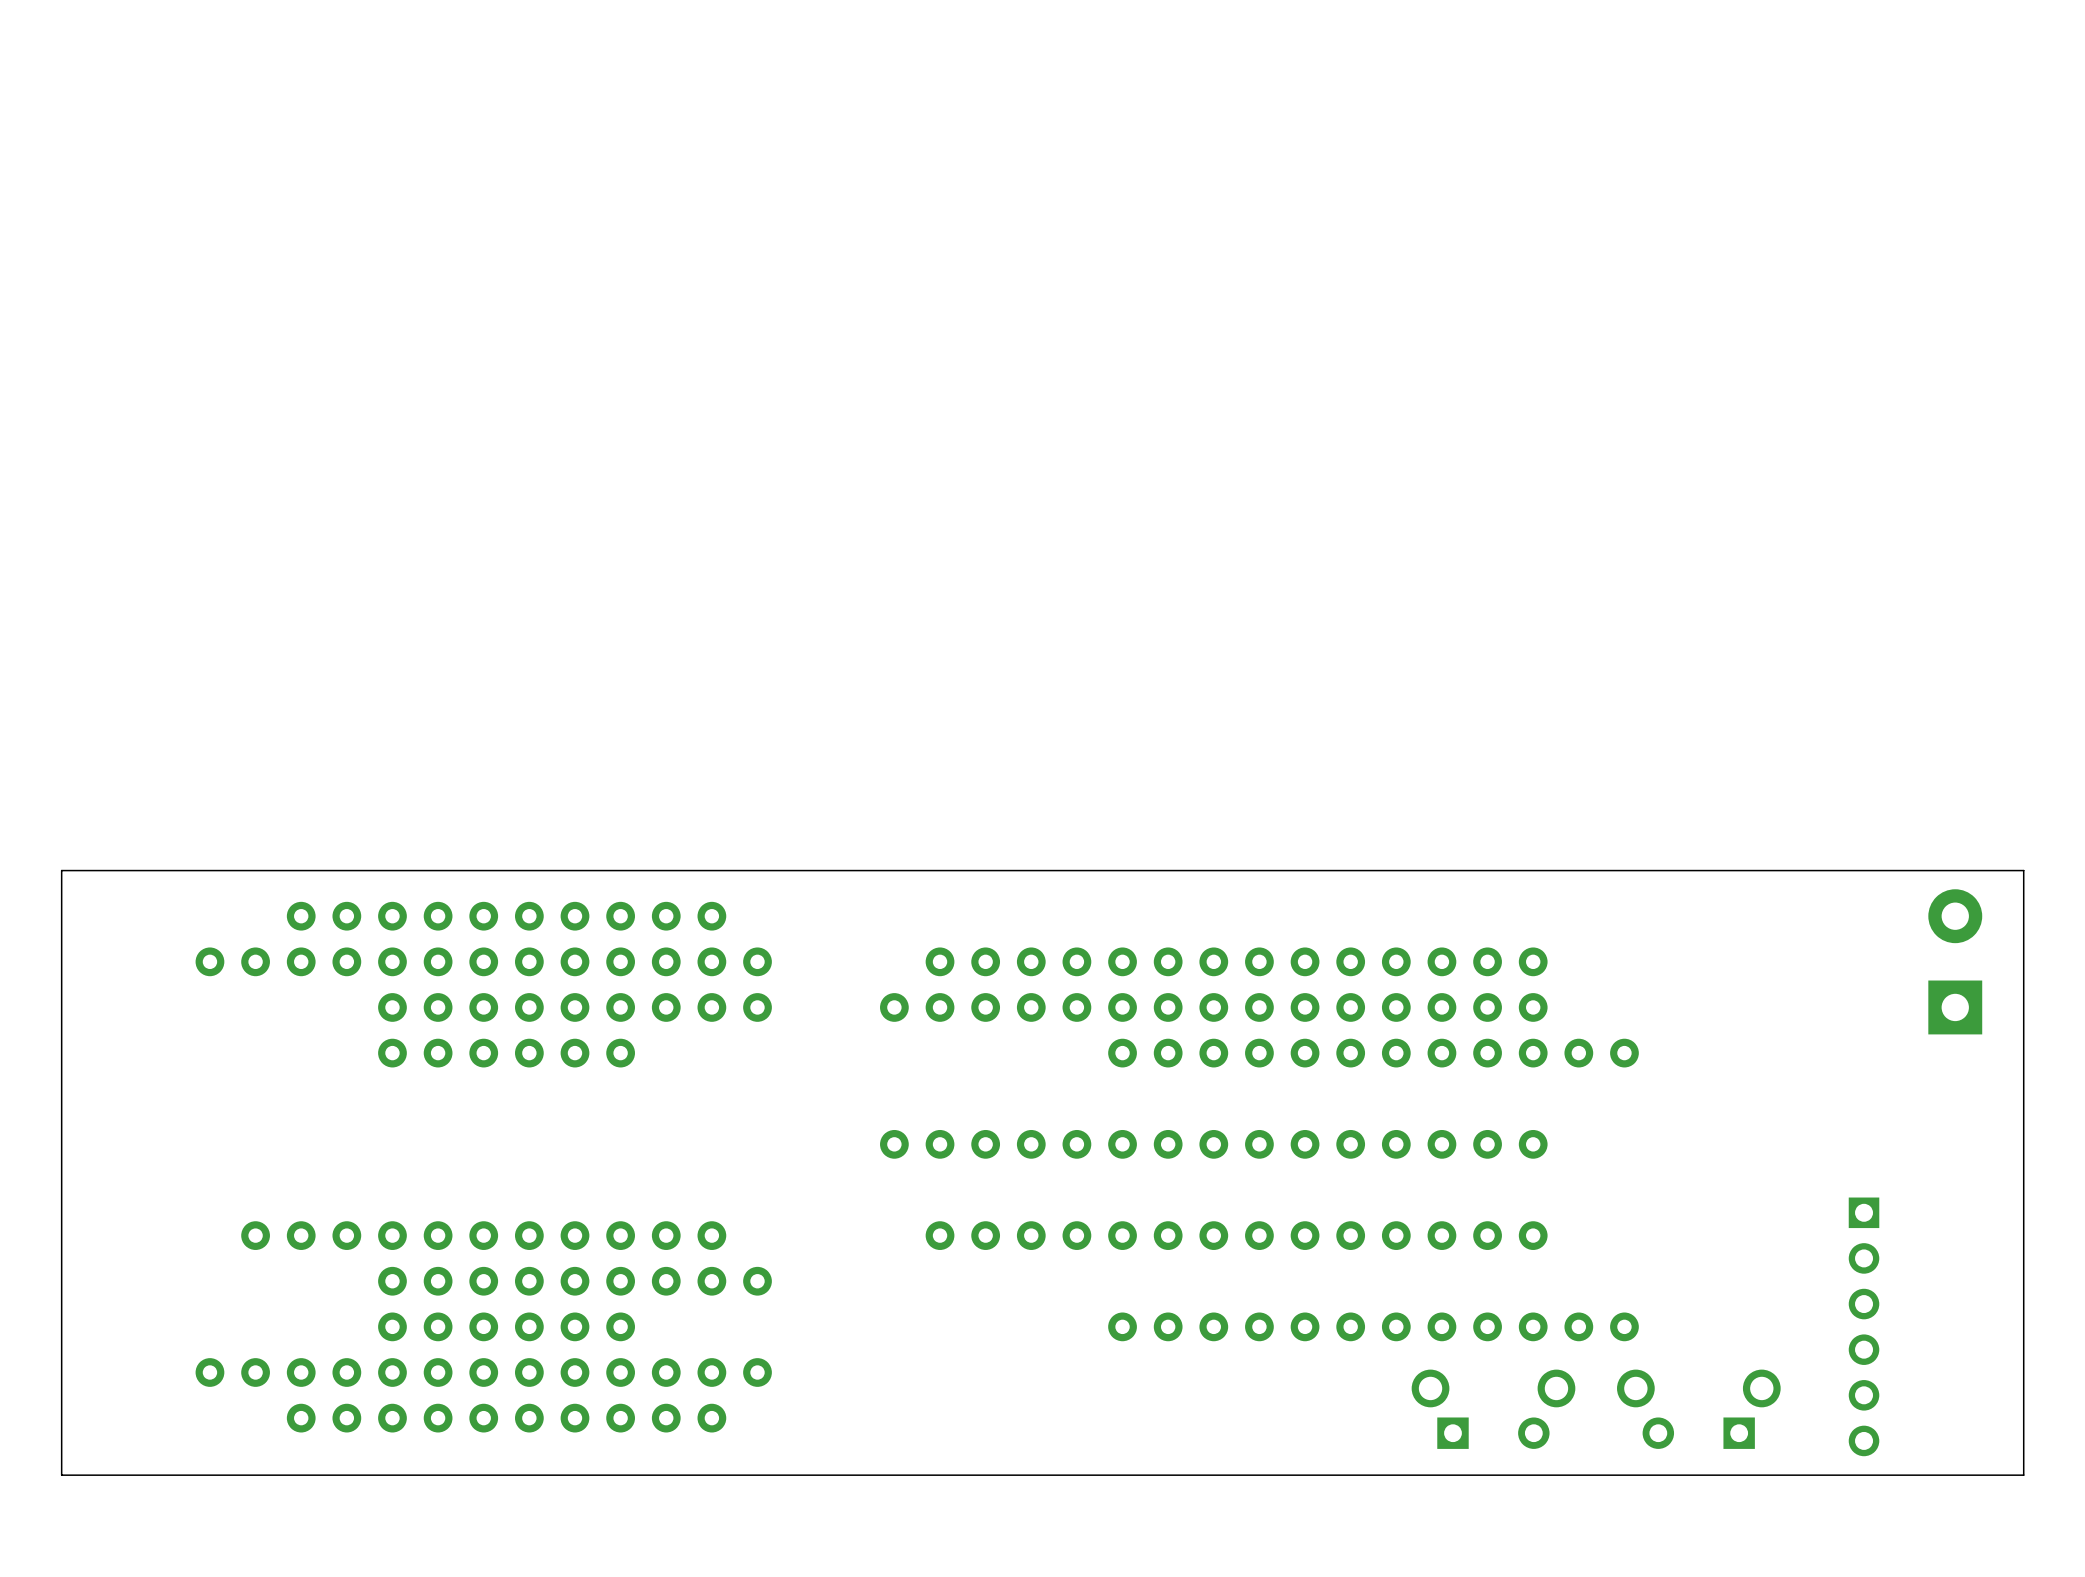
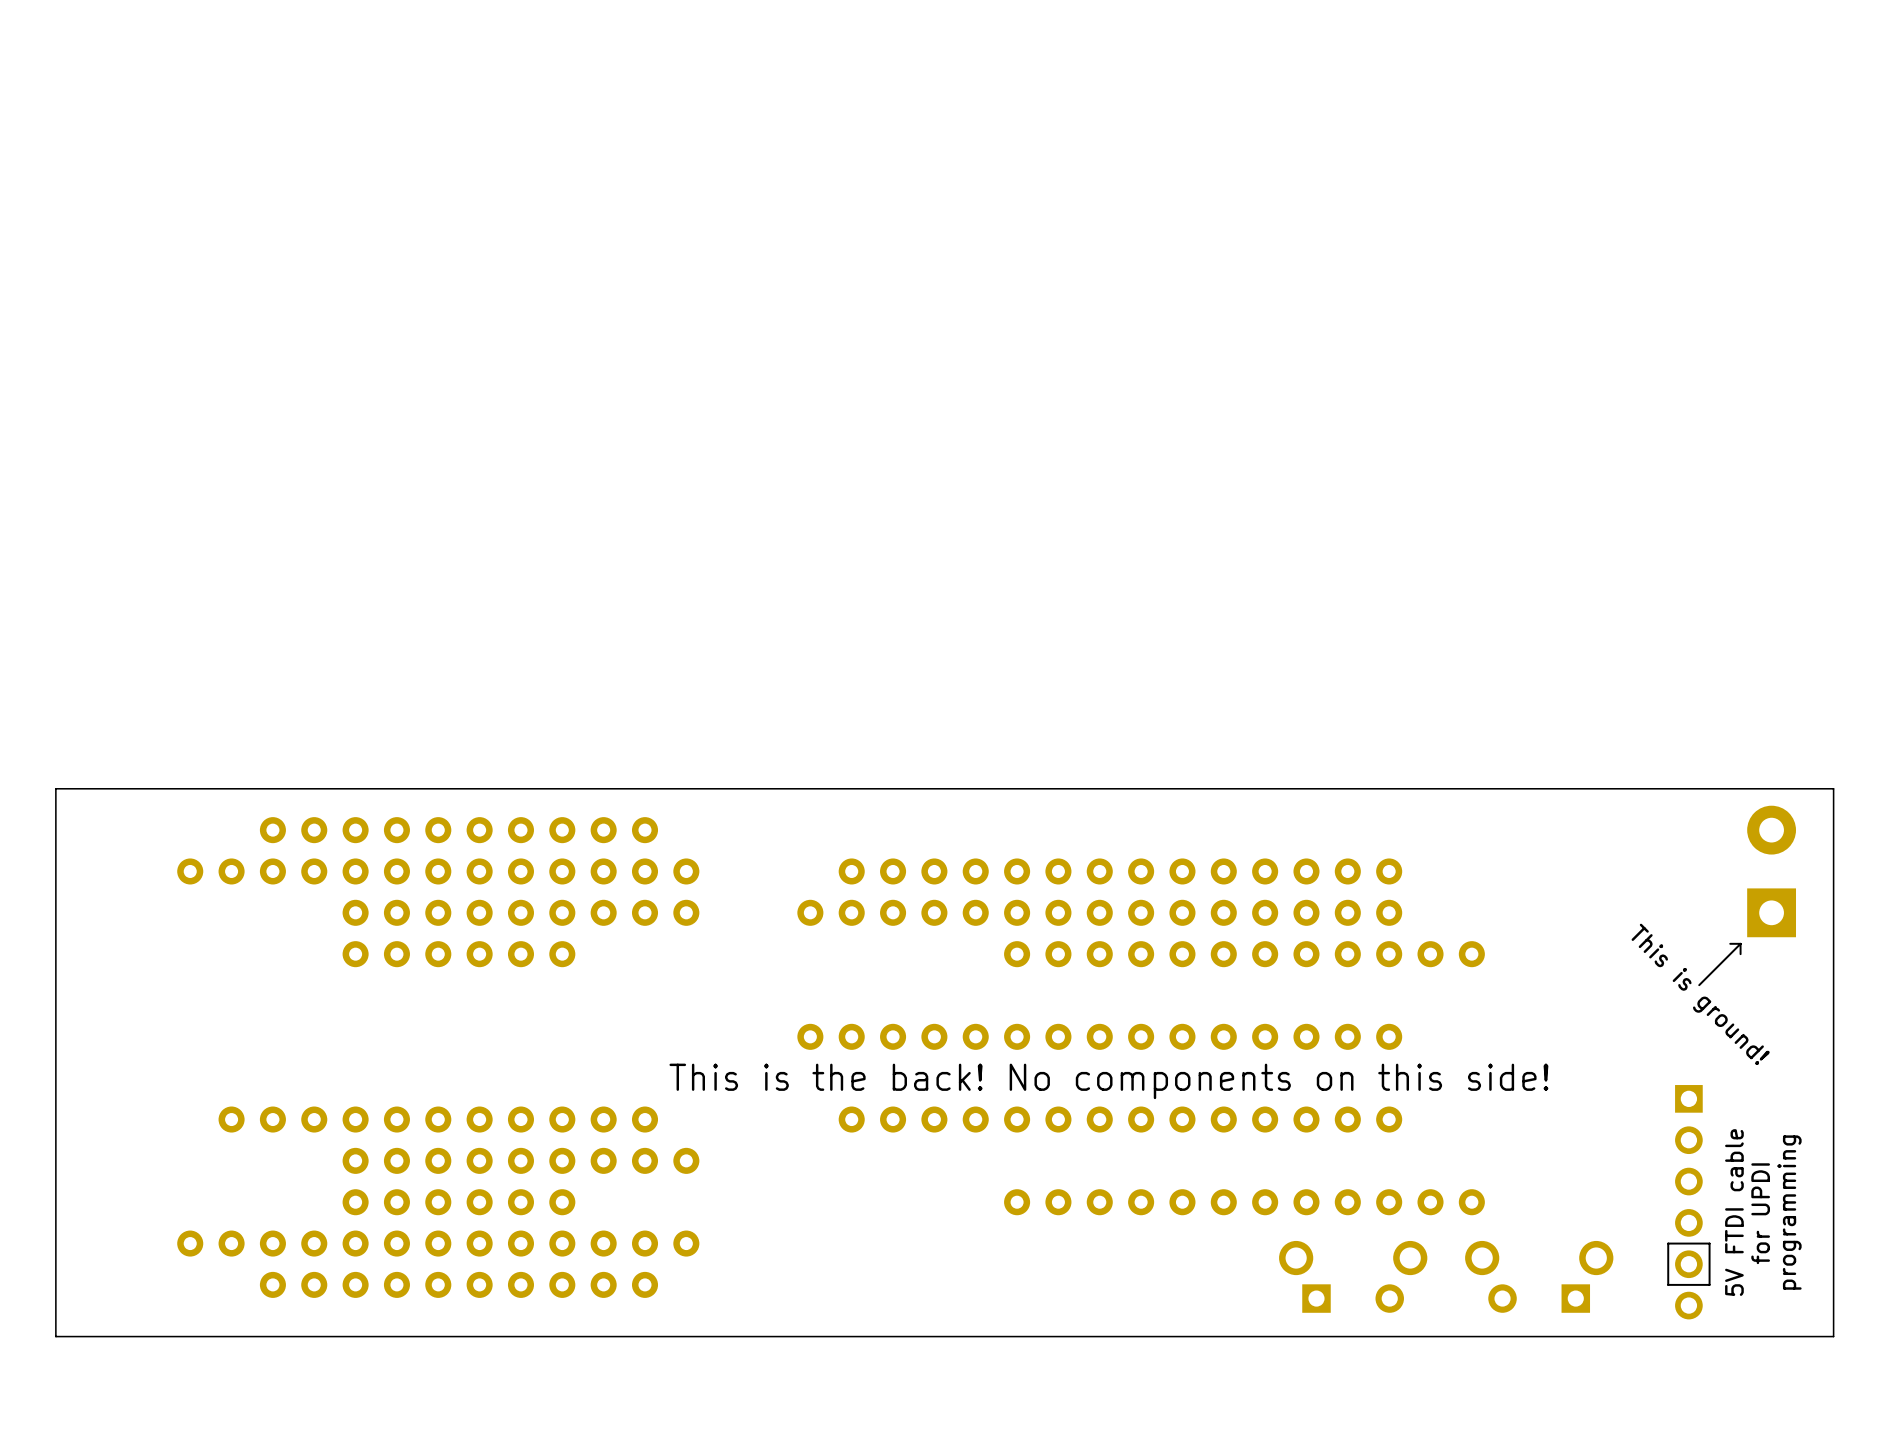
line: none -> (1740, 943) (1699, 985)
line: none -> (1740, 943) (1740, 954)
line: none -> (1740, 943) (1730, 943)
text: none -> This is ground! (1700, 994)
text: none -> This is the back! No components on this side! (1108, 1081)
text: none -> programming (1789, 1212)
text: none -> 5V FTDI cable (1734, 1212)
text: none -> for UPDI (1760, 1213)
line: none -> (1709, 1243) (1709, 1284) (1668, 1284) (1668, 1243) (1709, 1243)

